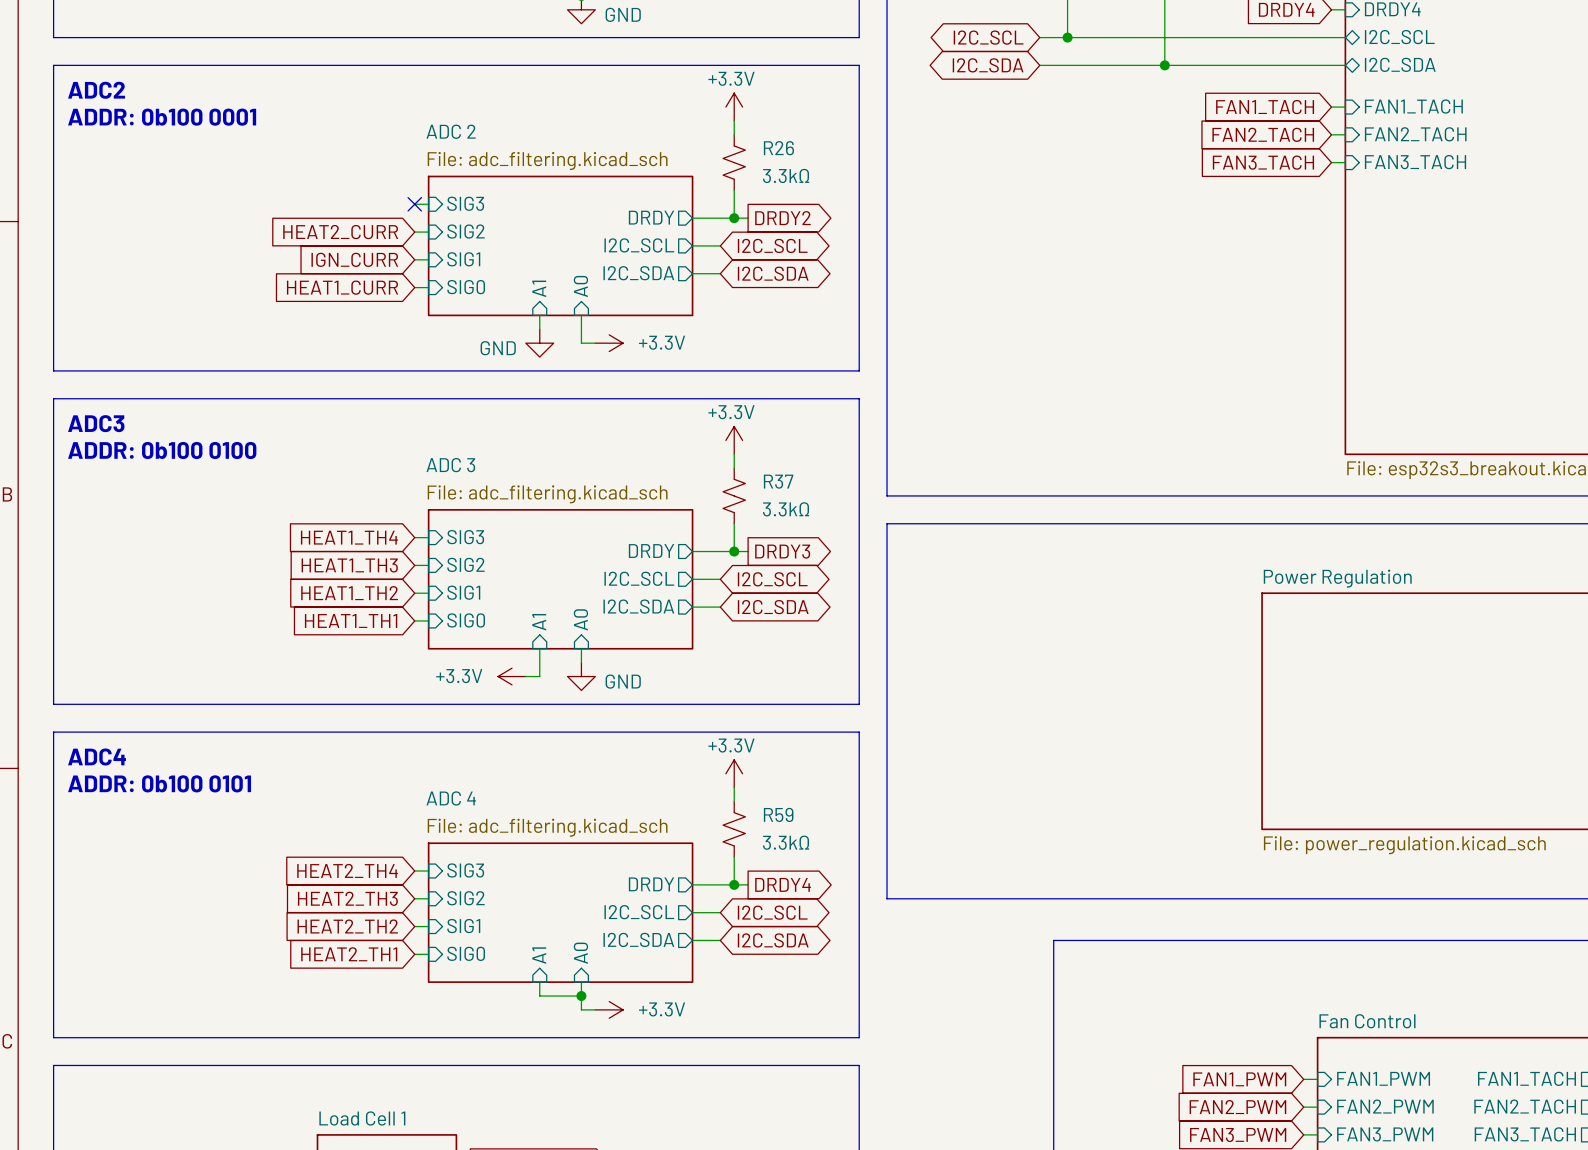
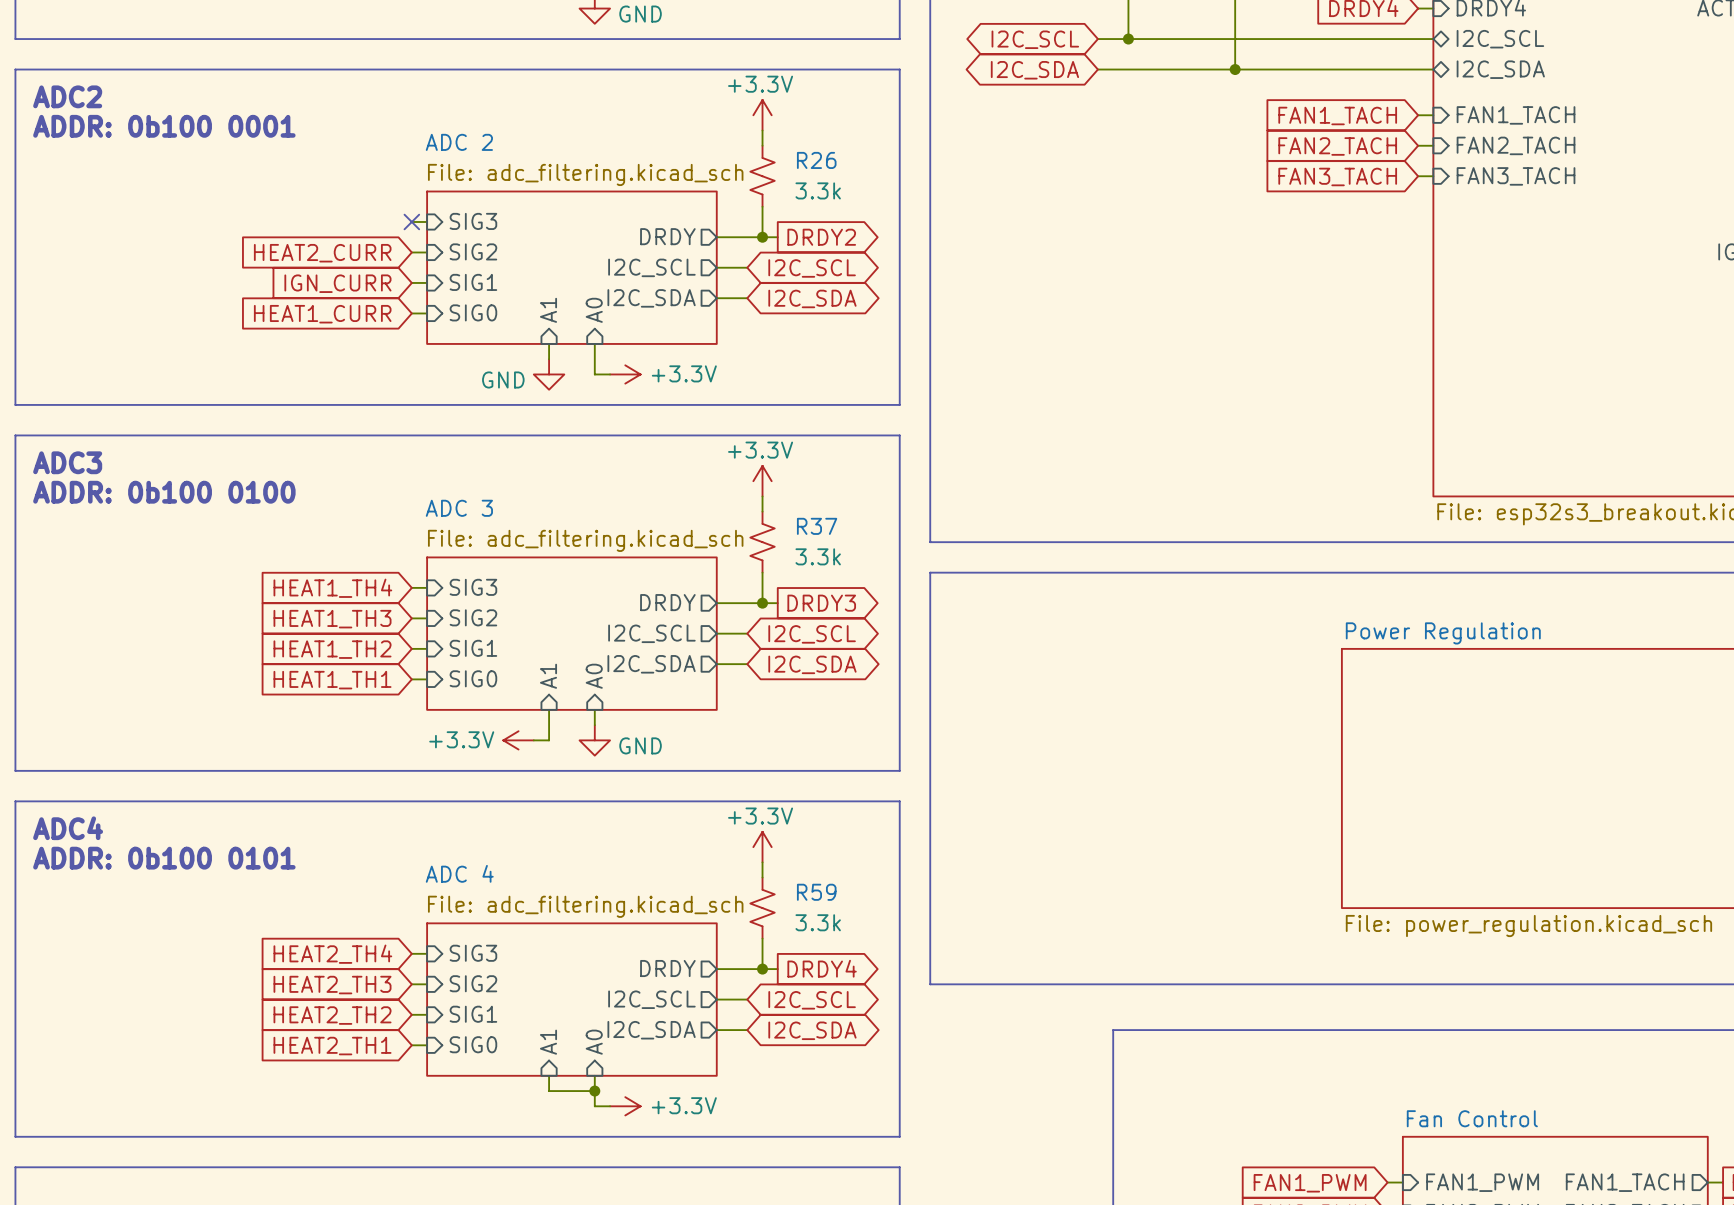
R26 value: 3.3kΩ (786, 175) -> 3.3k (818, 190)
R37 value: 3.3kΩ (786, 509) -> 3.3k (818, 556)
R59 value: 3.3kΩ (786, 842) -> 3.3k (818, 922)

